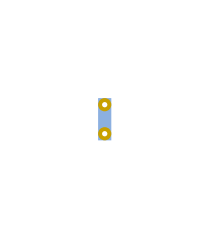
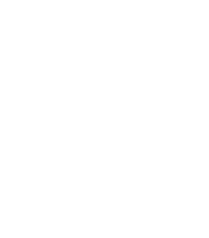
part: (104, 119) -> none

